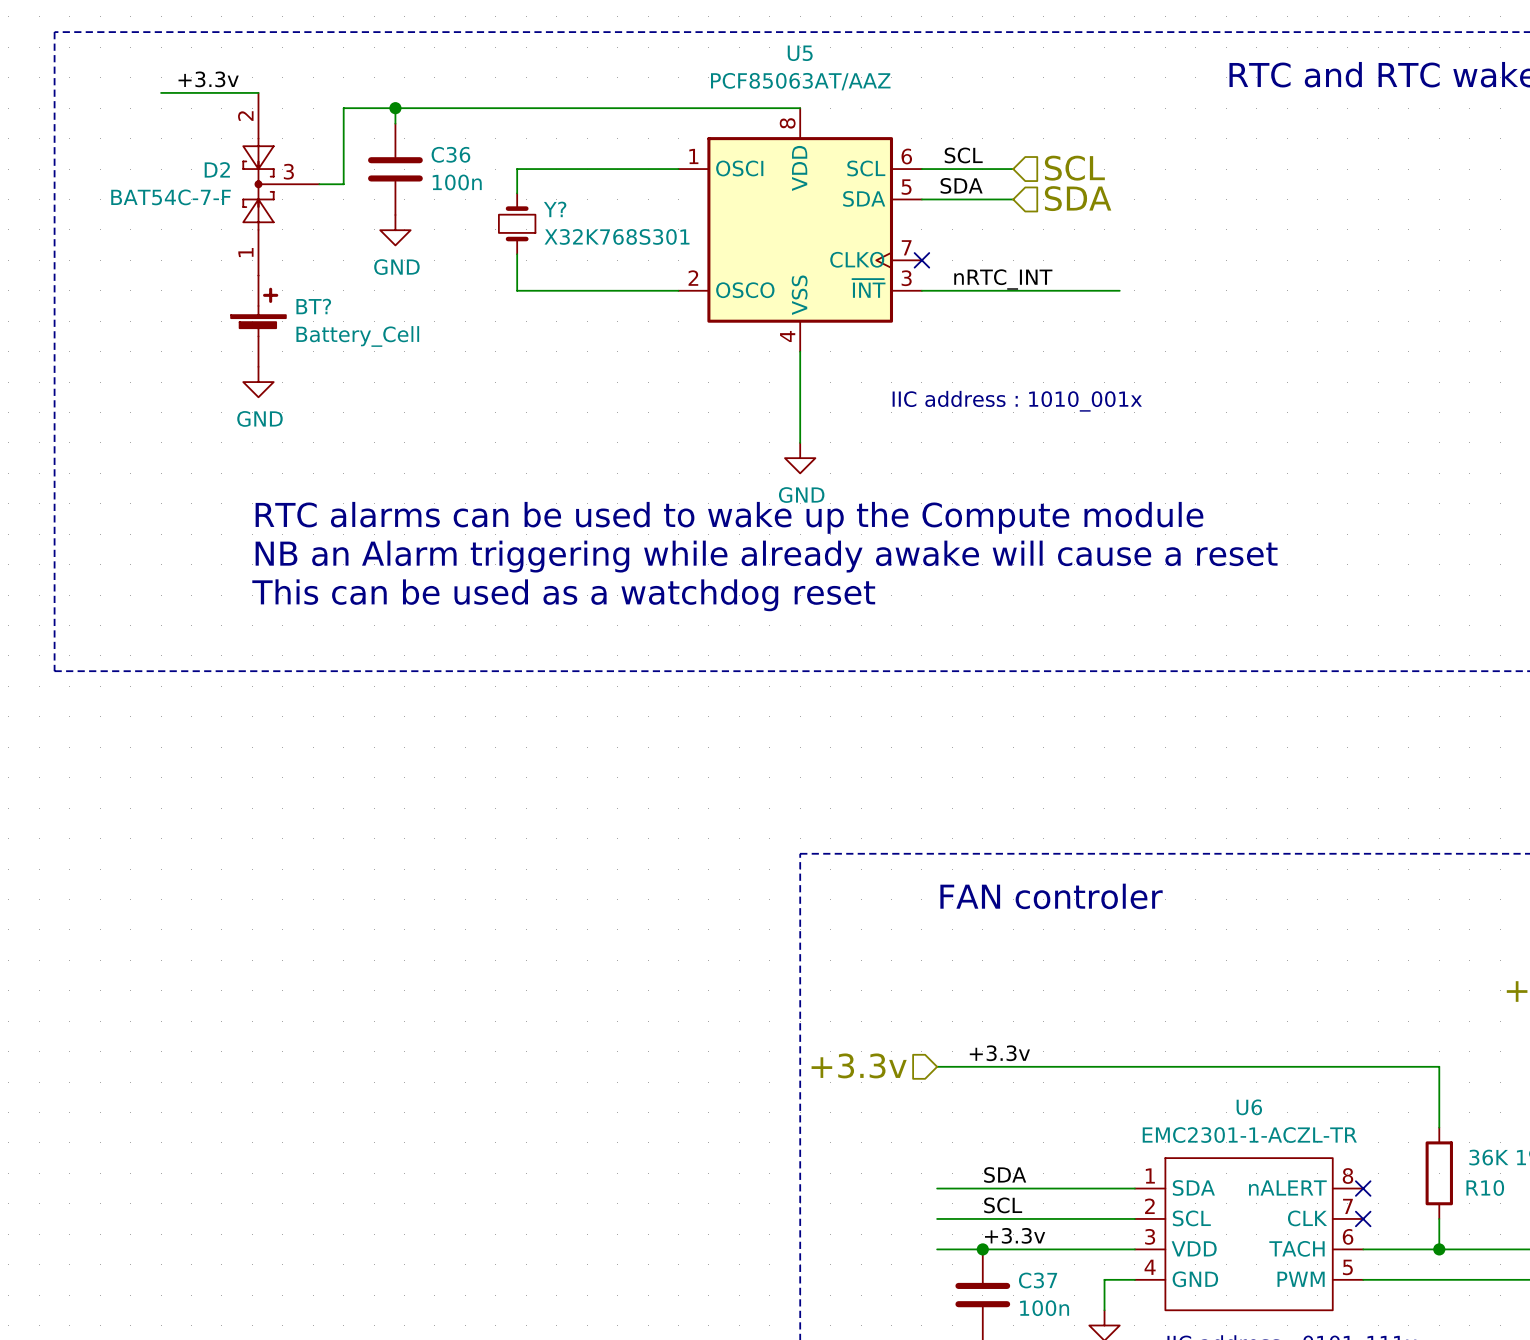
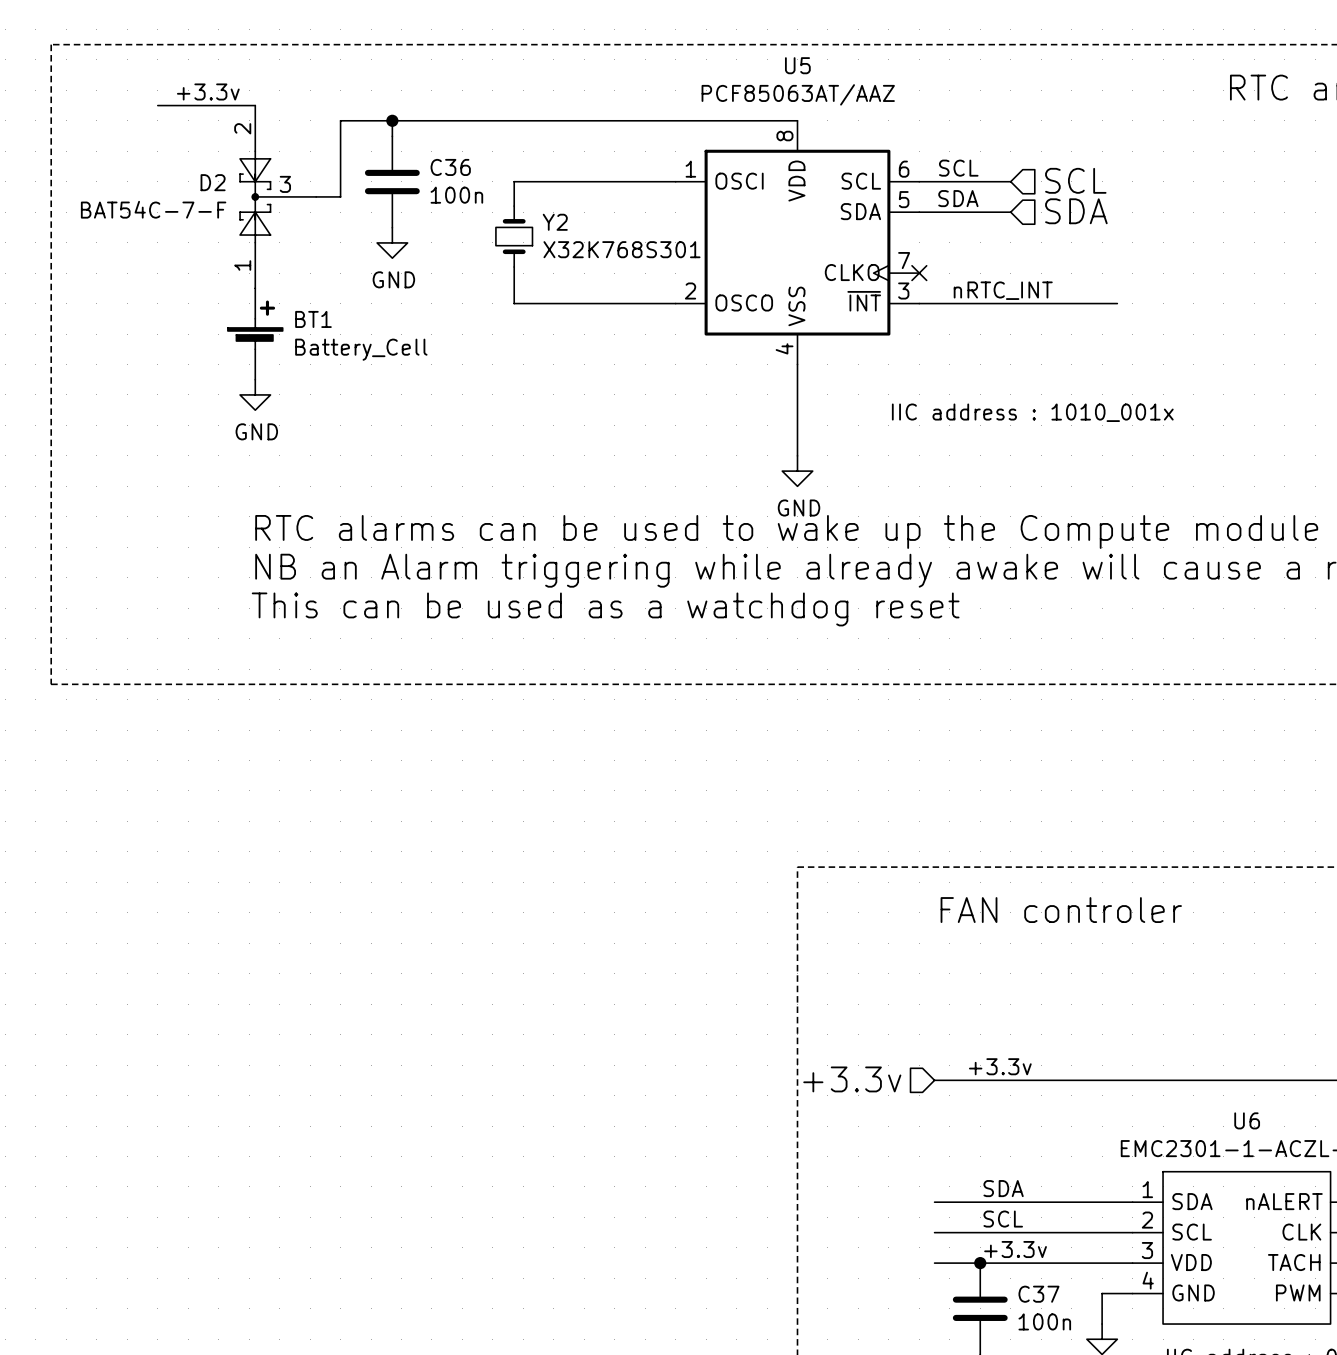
Y? name: Y? (555, 209) -> Y2 (555, 222)
BT? name: BT? (313, 306) -> BT1 (313, 319)

